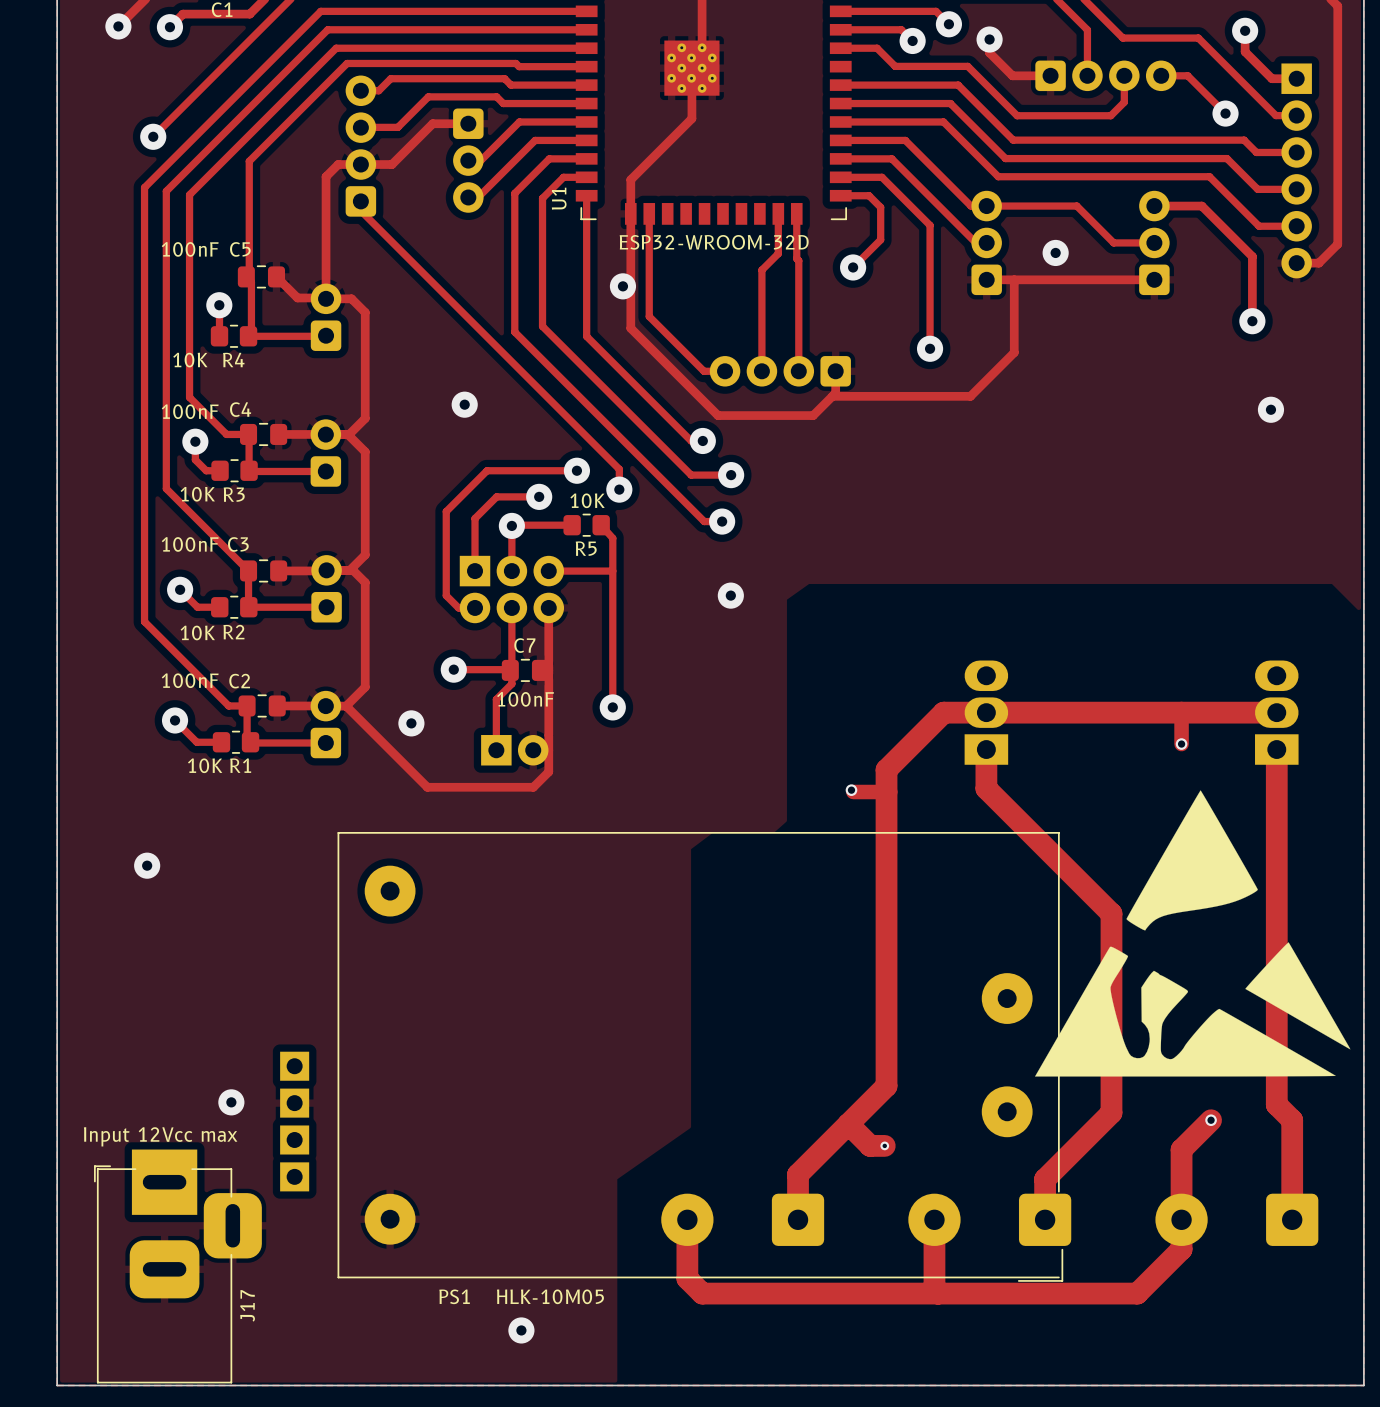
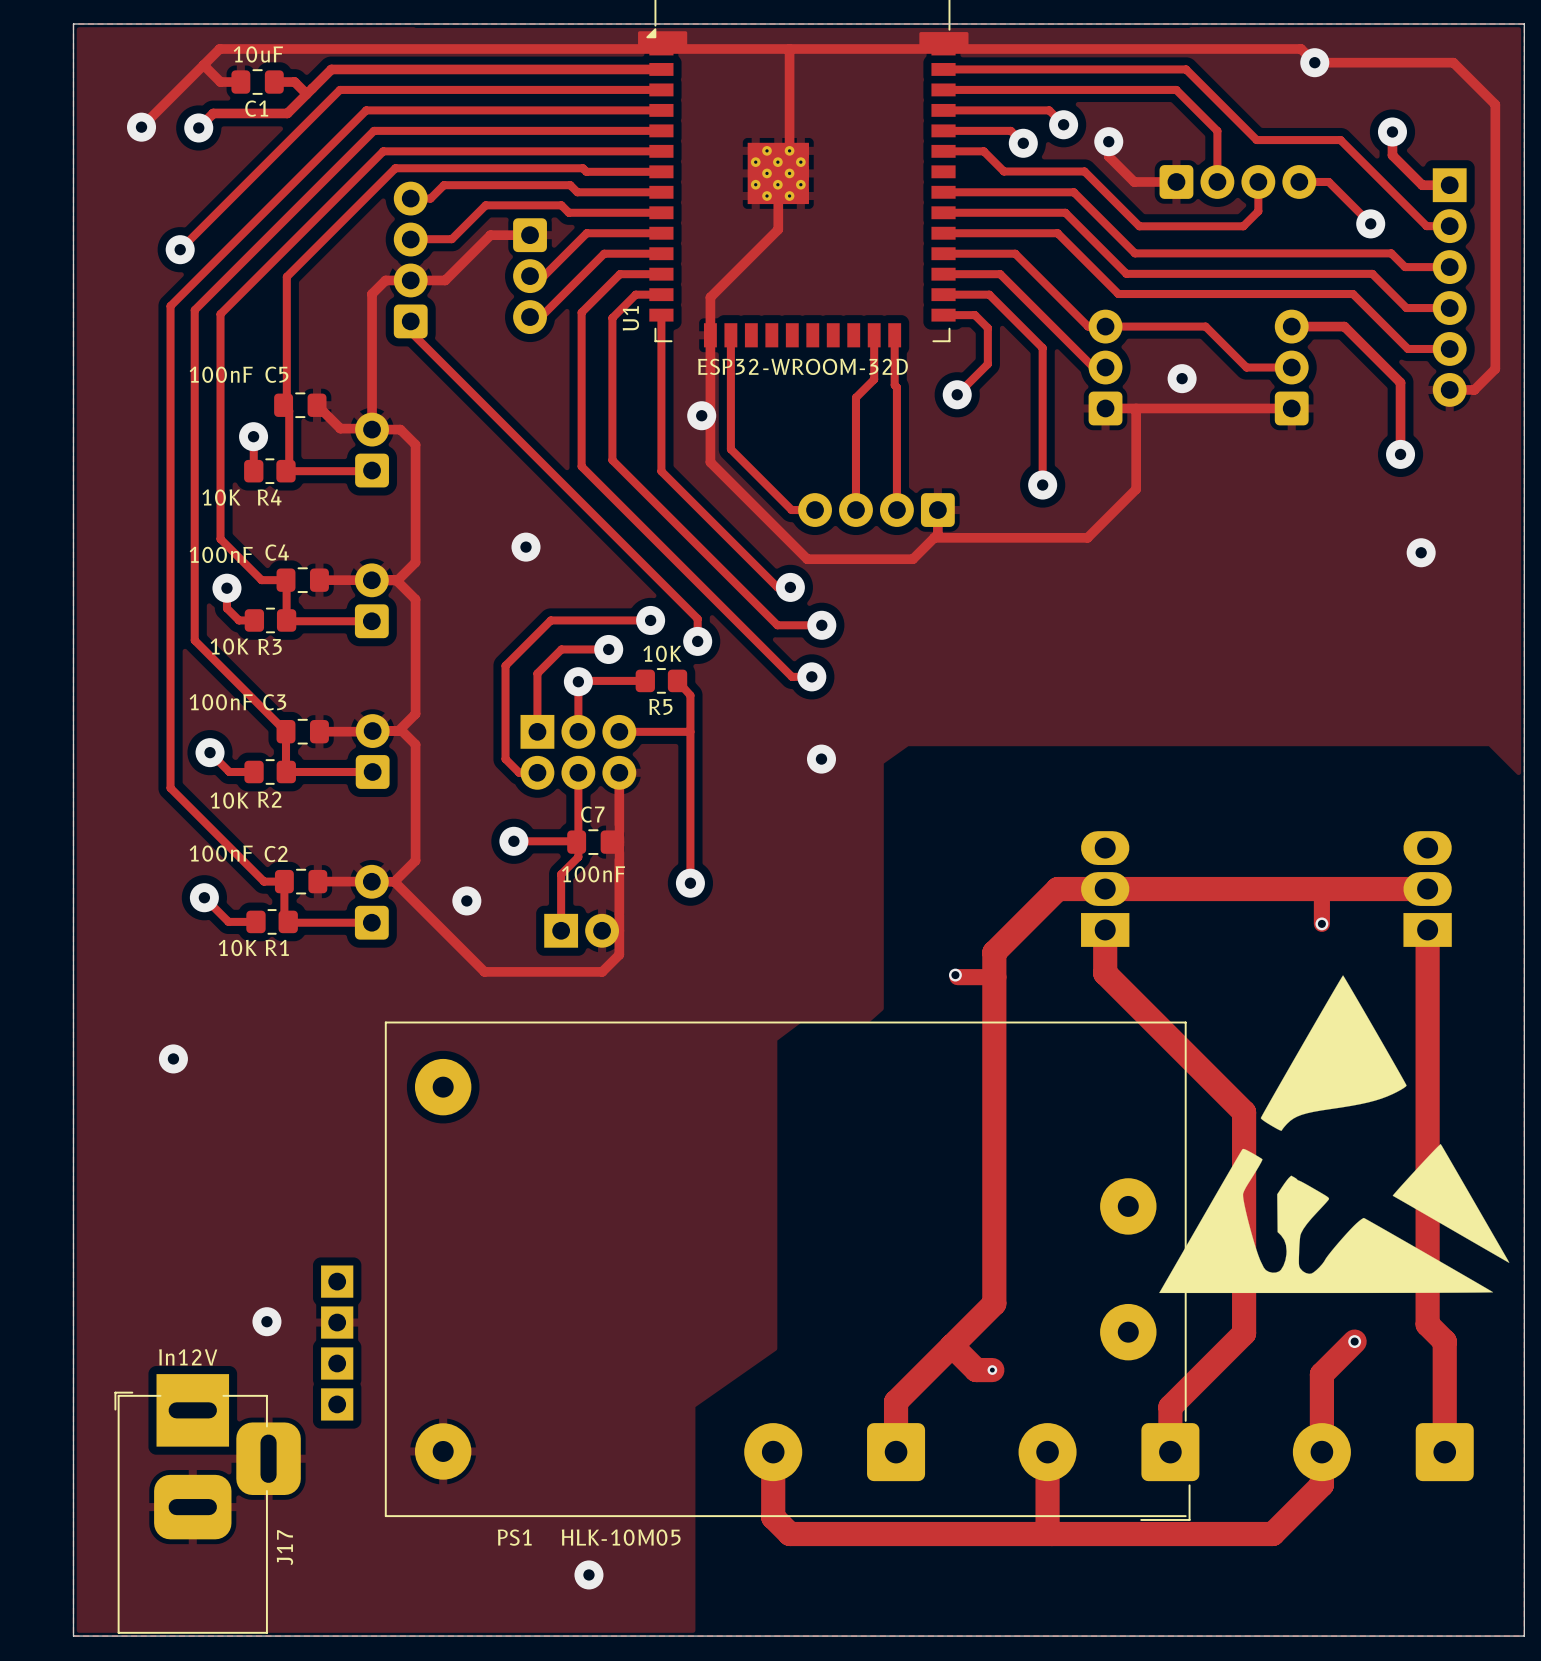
J17 value: Input 12Vcc max (160, 1136) -> In12V (188, 1357)

